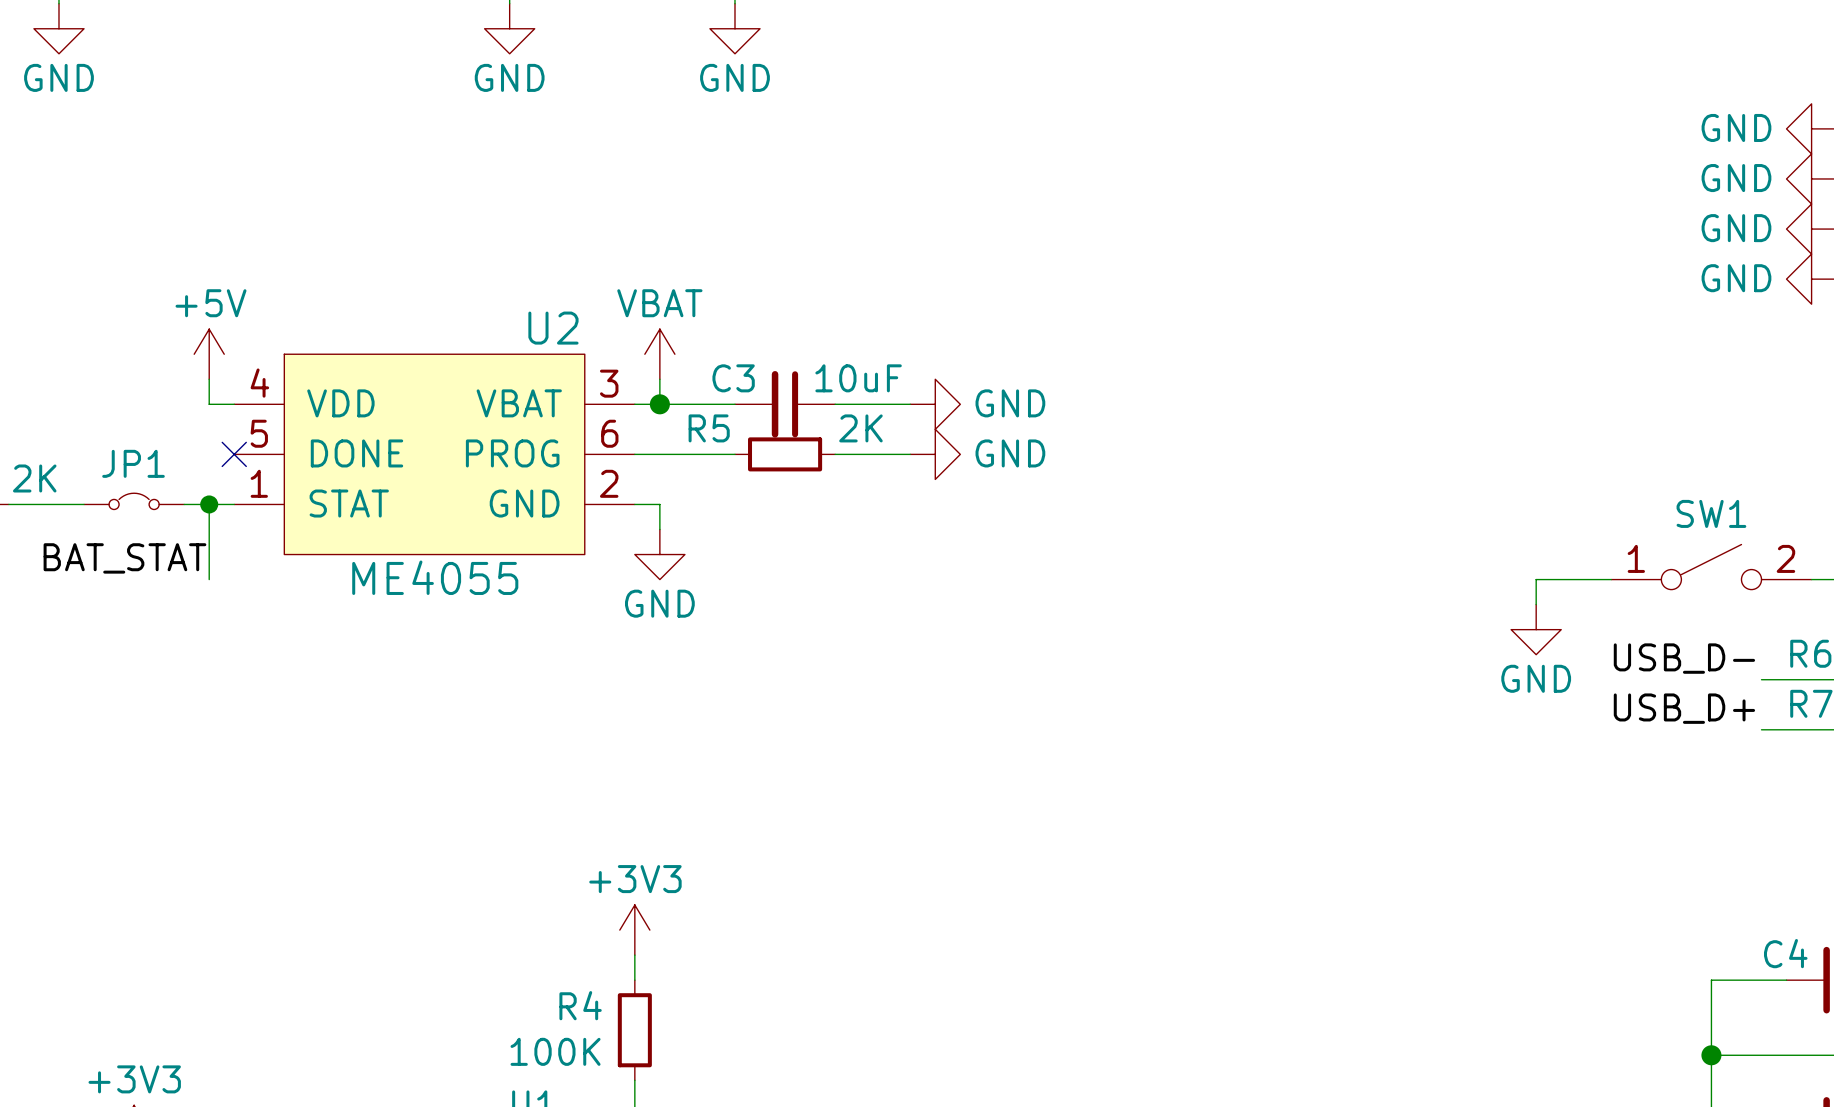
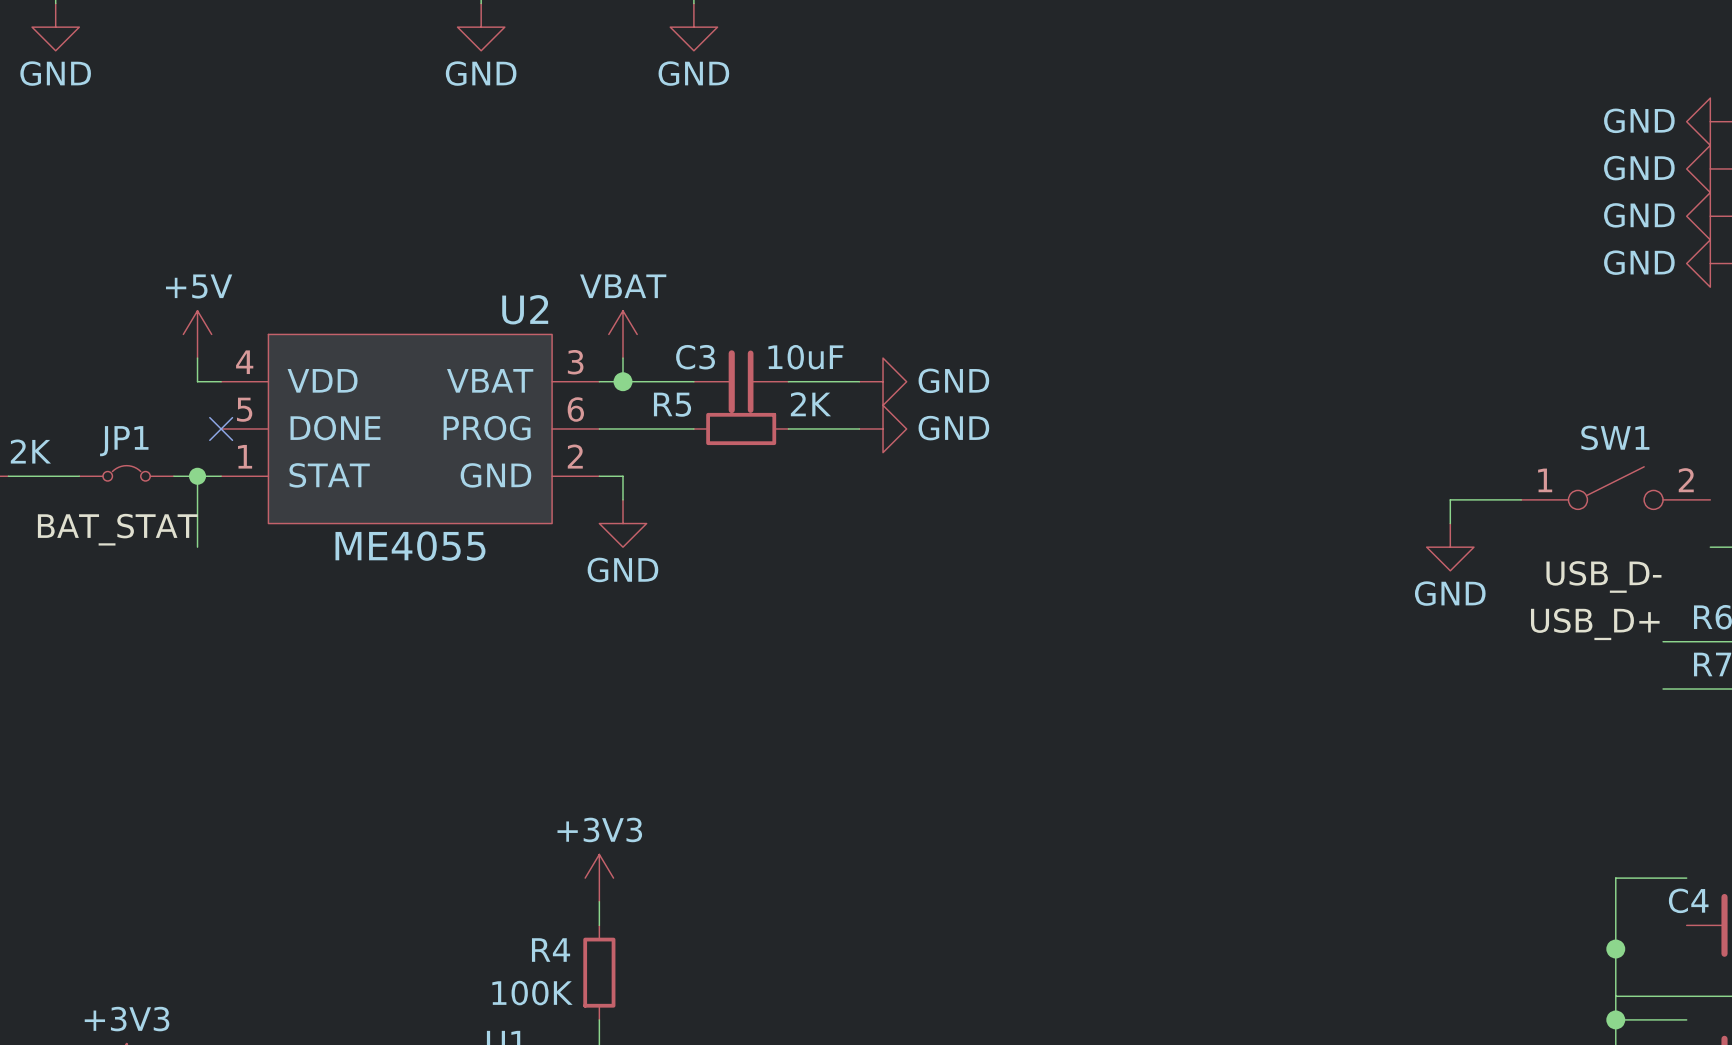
SW1 position: (1711, 567) -> (1615, 488)
wire: (1611, 579) (1536, 579) (1536, 604) -> (1521, 499) (1450, 499) (1450, 523)
label: none -> USB_D- (1603, 576)
power symbol position: GND (1536, 629) -> GND (1450, 547)
label: USB_D- (1684, 658) -> USB_D+ (1595, 624)
label: USB_D+ (1684, 708) -> none
wire: (1711, 980) (1786, 980) -> (1615, 925) (1615, 878) (1686, 878)
junction: none -> (1615, 949)
junction: (1711, 1055) -> none
wire: none -> (1615, 1019) (1686, 1019)
junction: none -> (1615, 1019)

